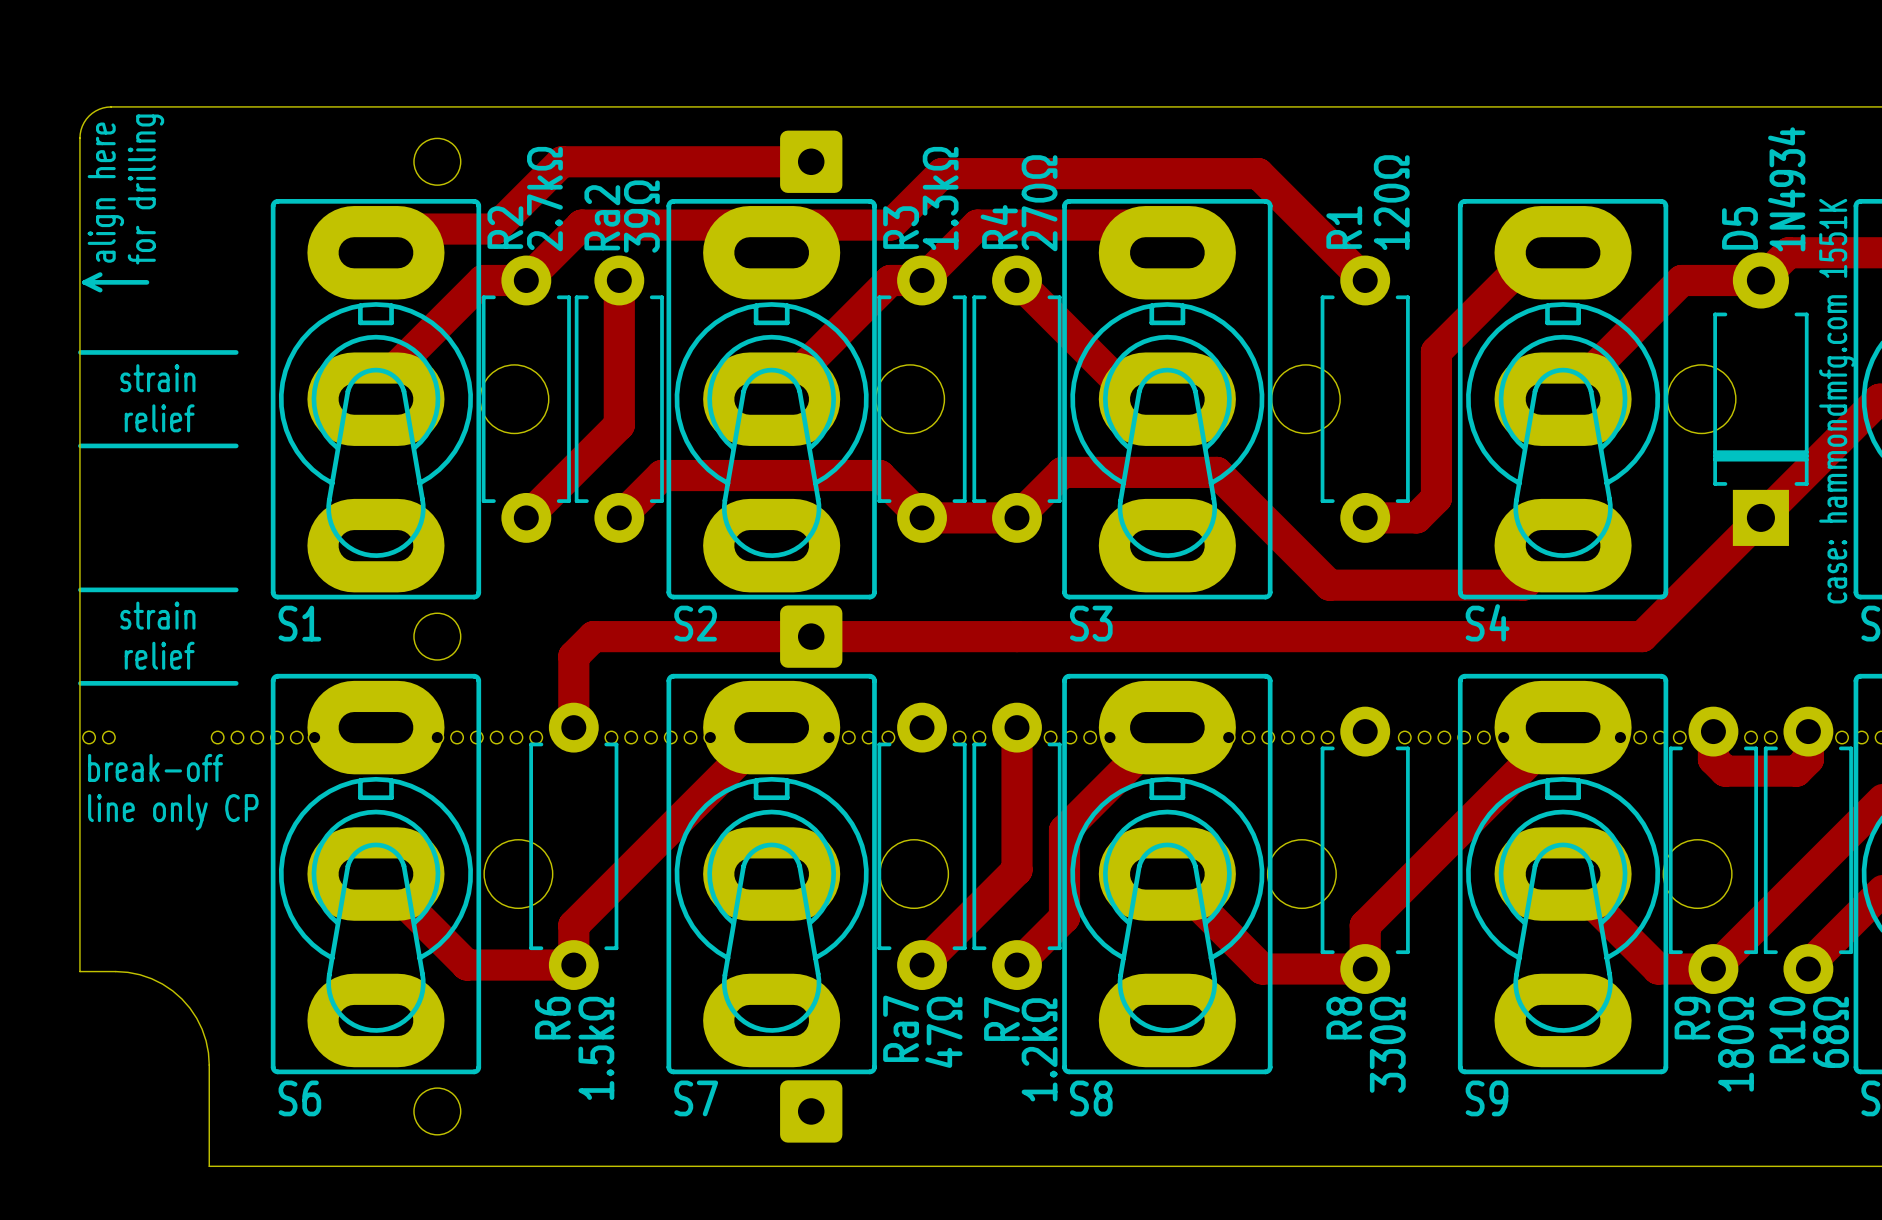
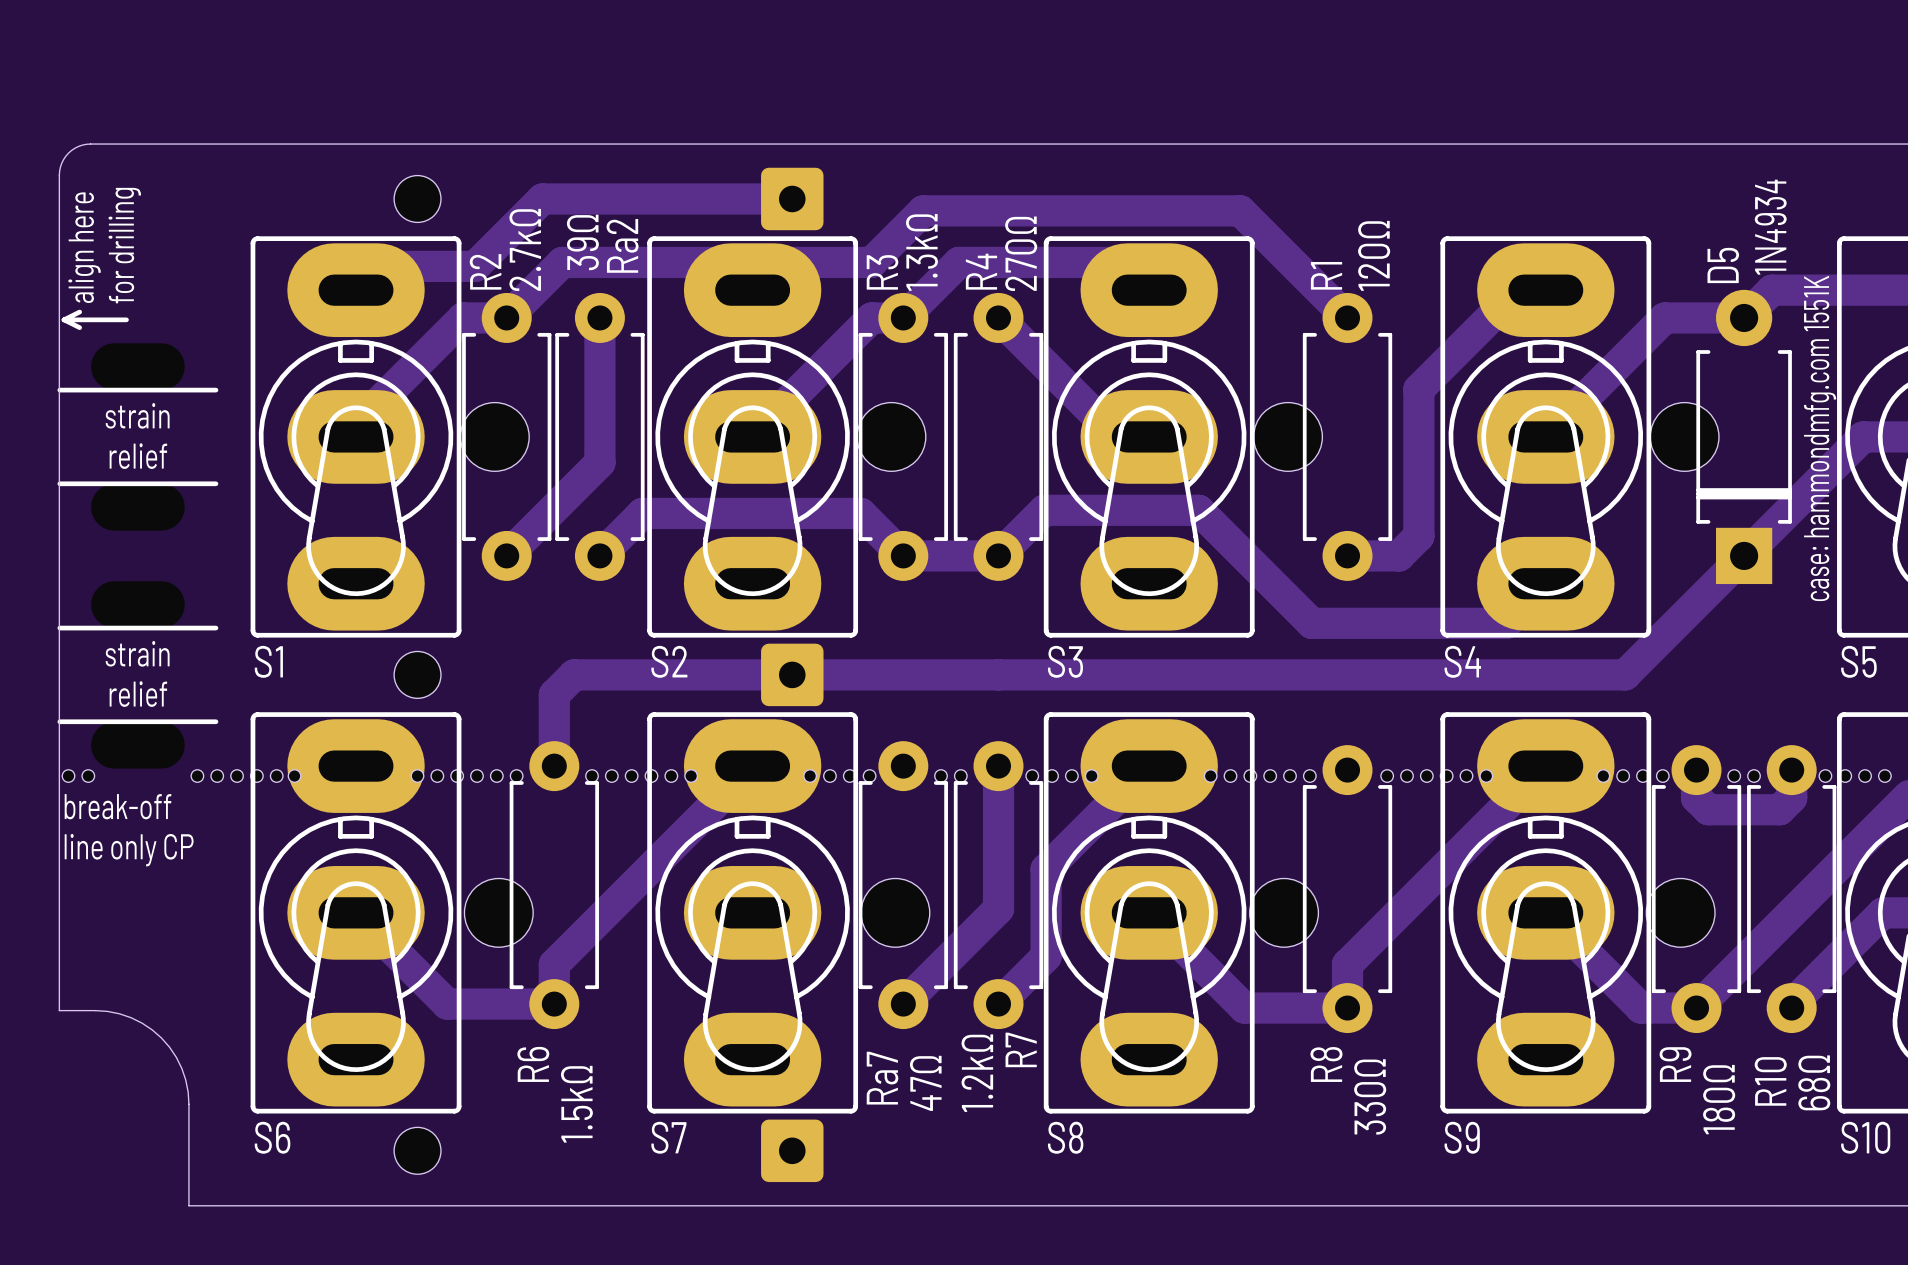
Ra2 value position: 39Ω (641, 216) -> 39Ω (582, 242)
Ra2 name position: Ra2 (602, 217) -> Ra2 (622, 245)
R7 name position: R7 (1001, 1018) -> R7 (1021, 1049)
R7 value position: 1.2kΩ (1039, 1049) -> 1.2kΩ (977, 1073)

